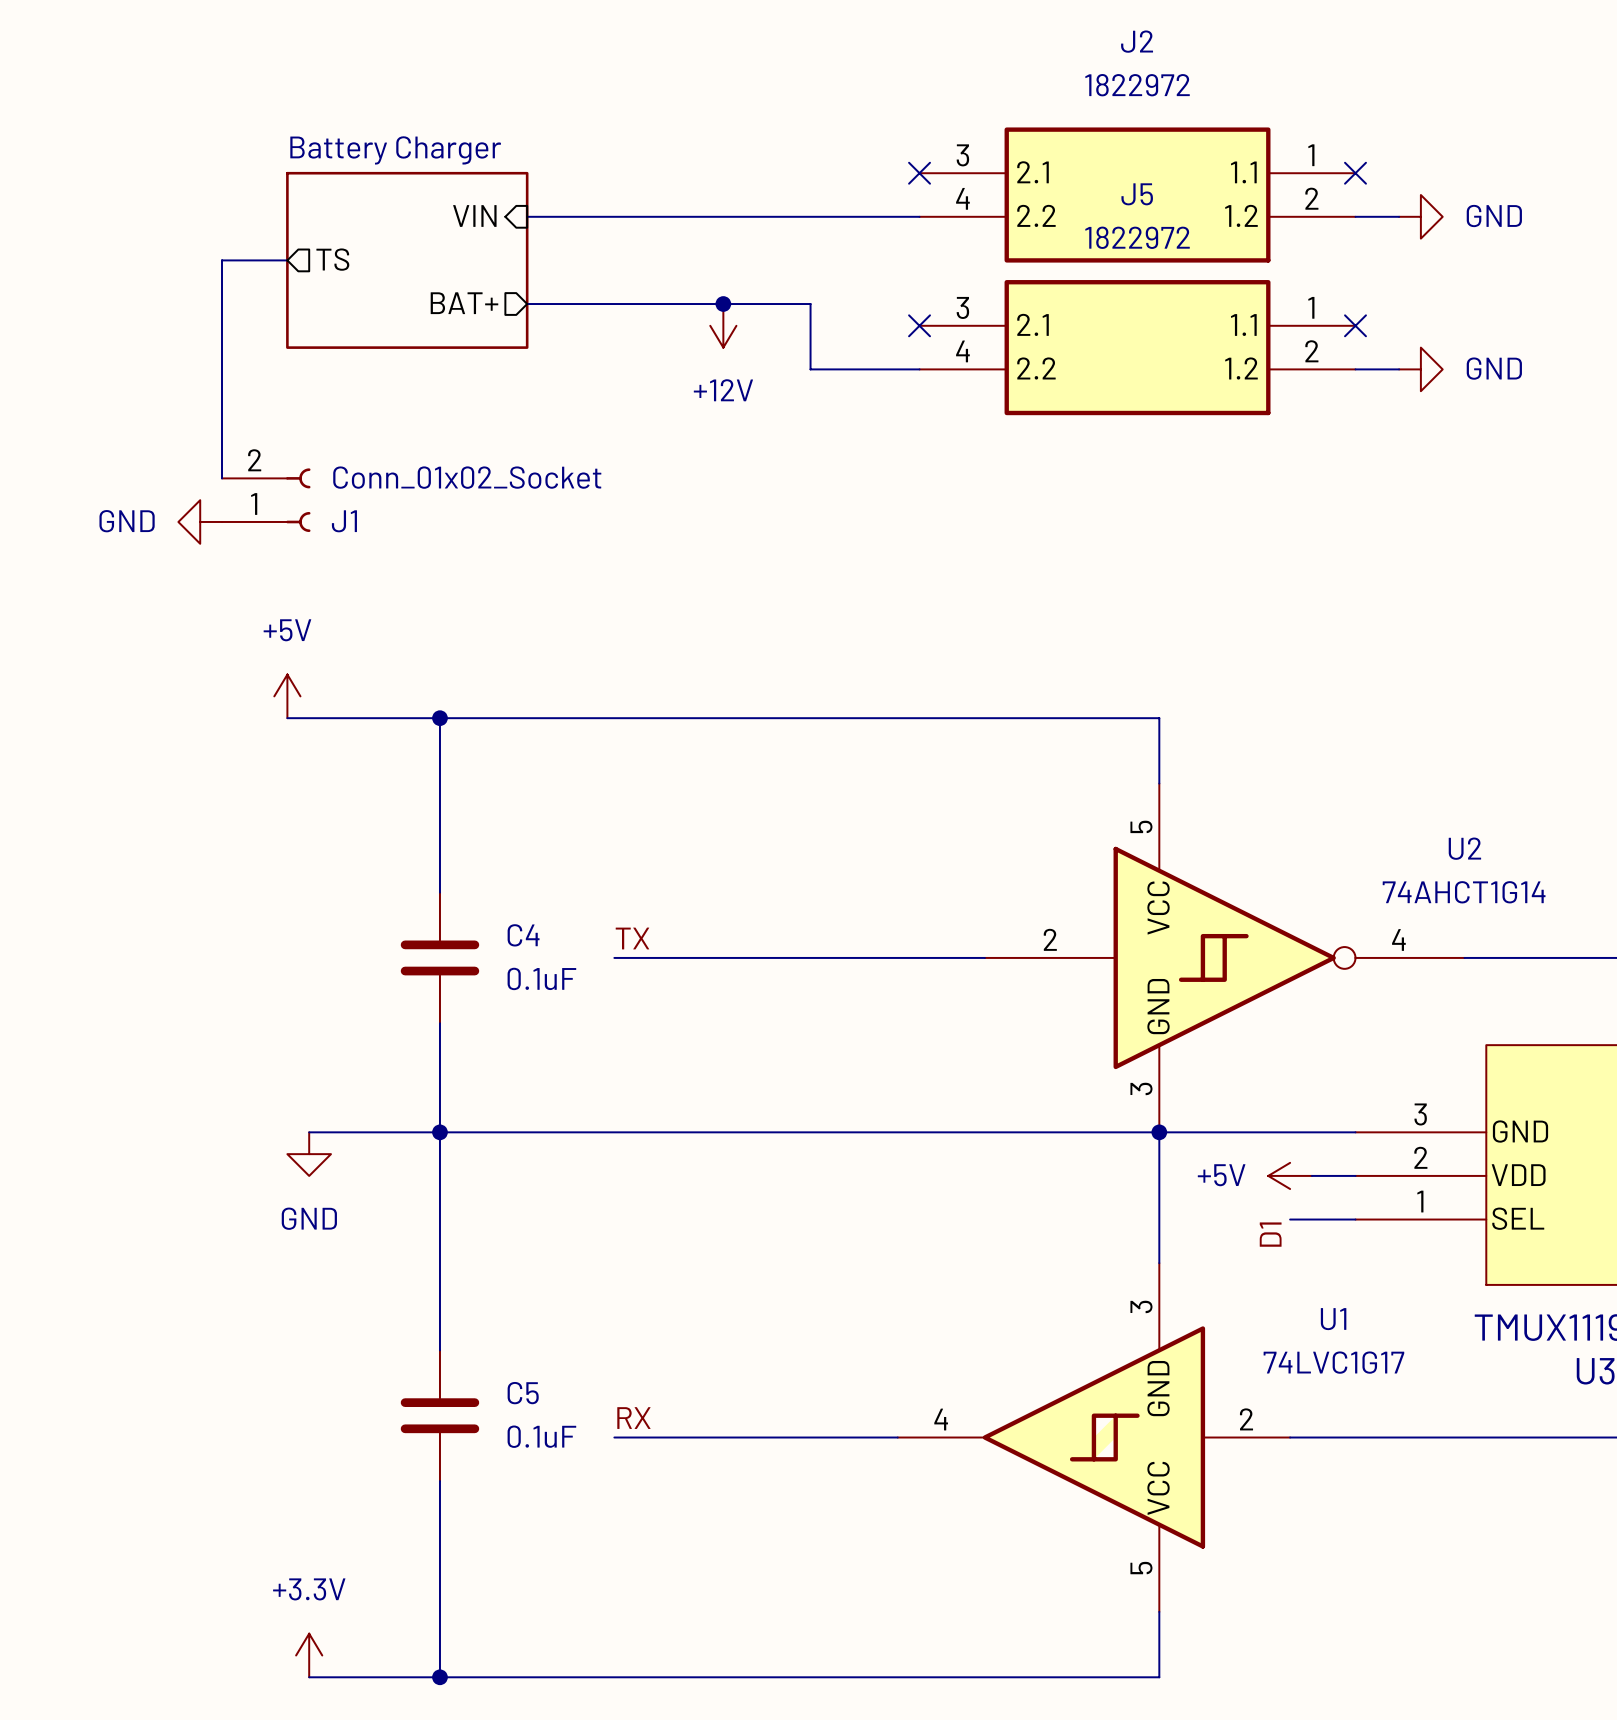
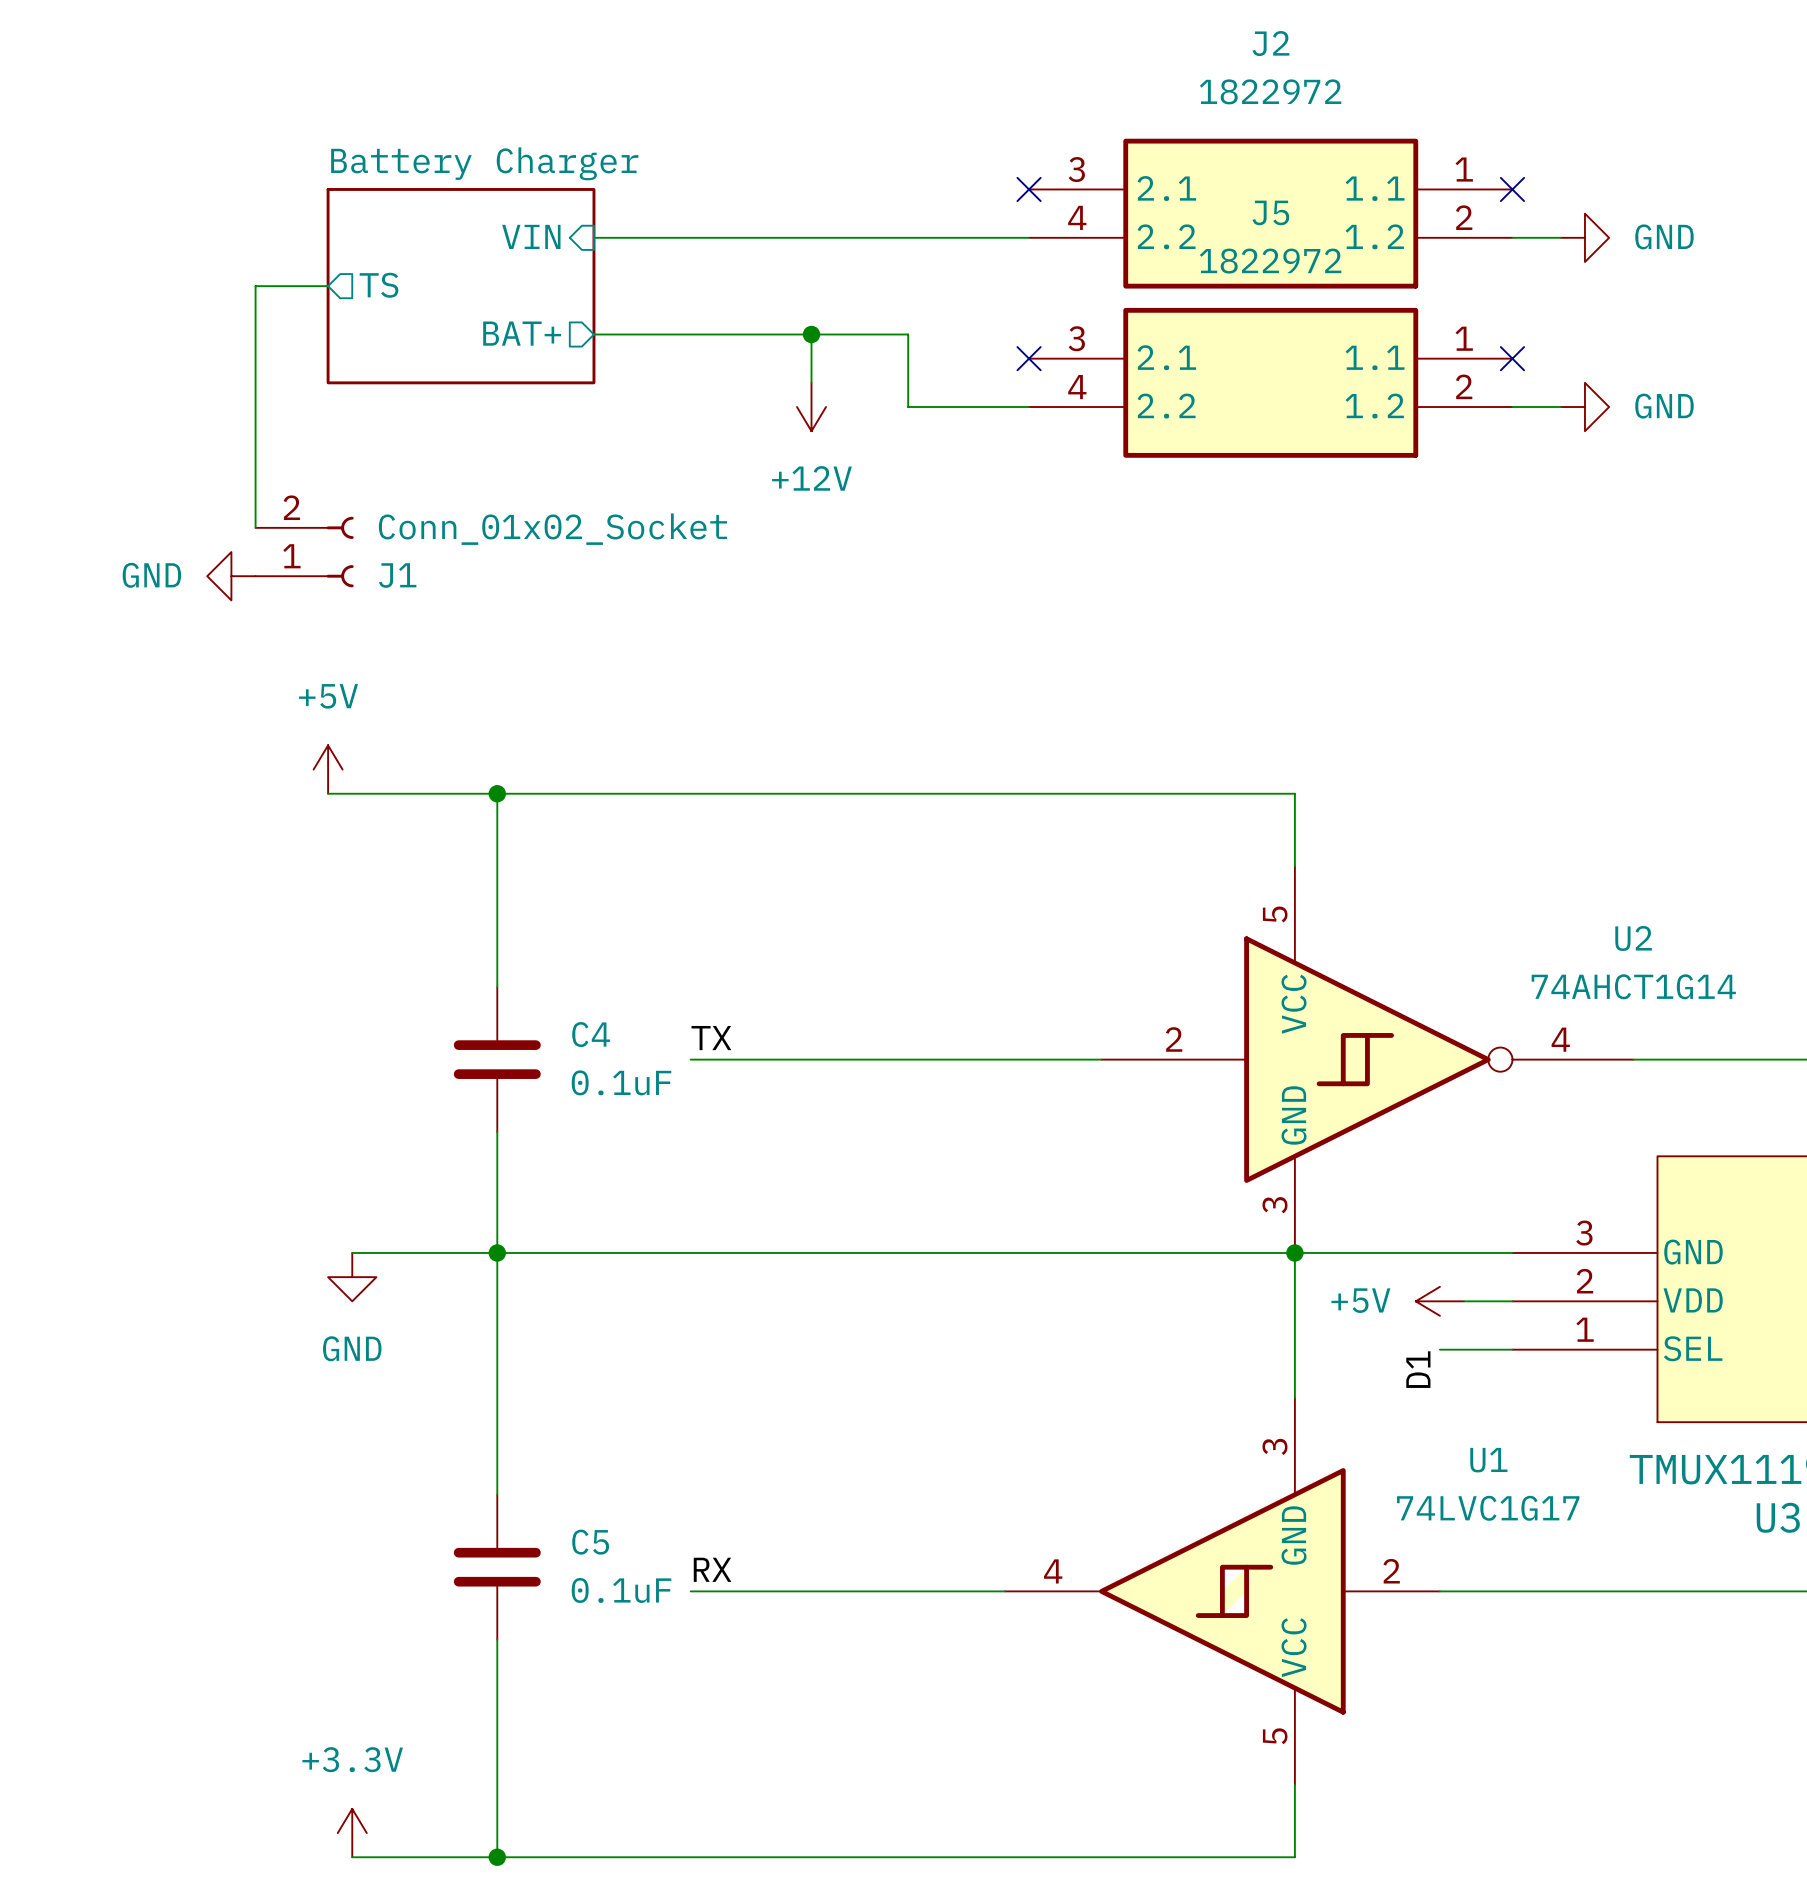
power symbol position: +12V (723, 325) -> +12V (811, 407)

